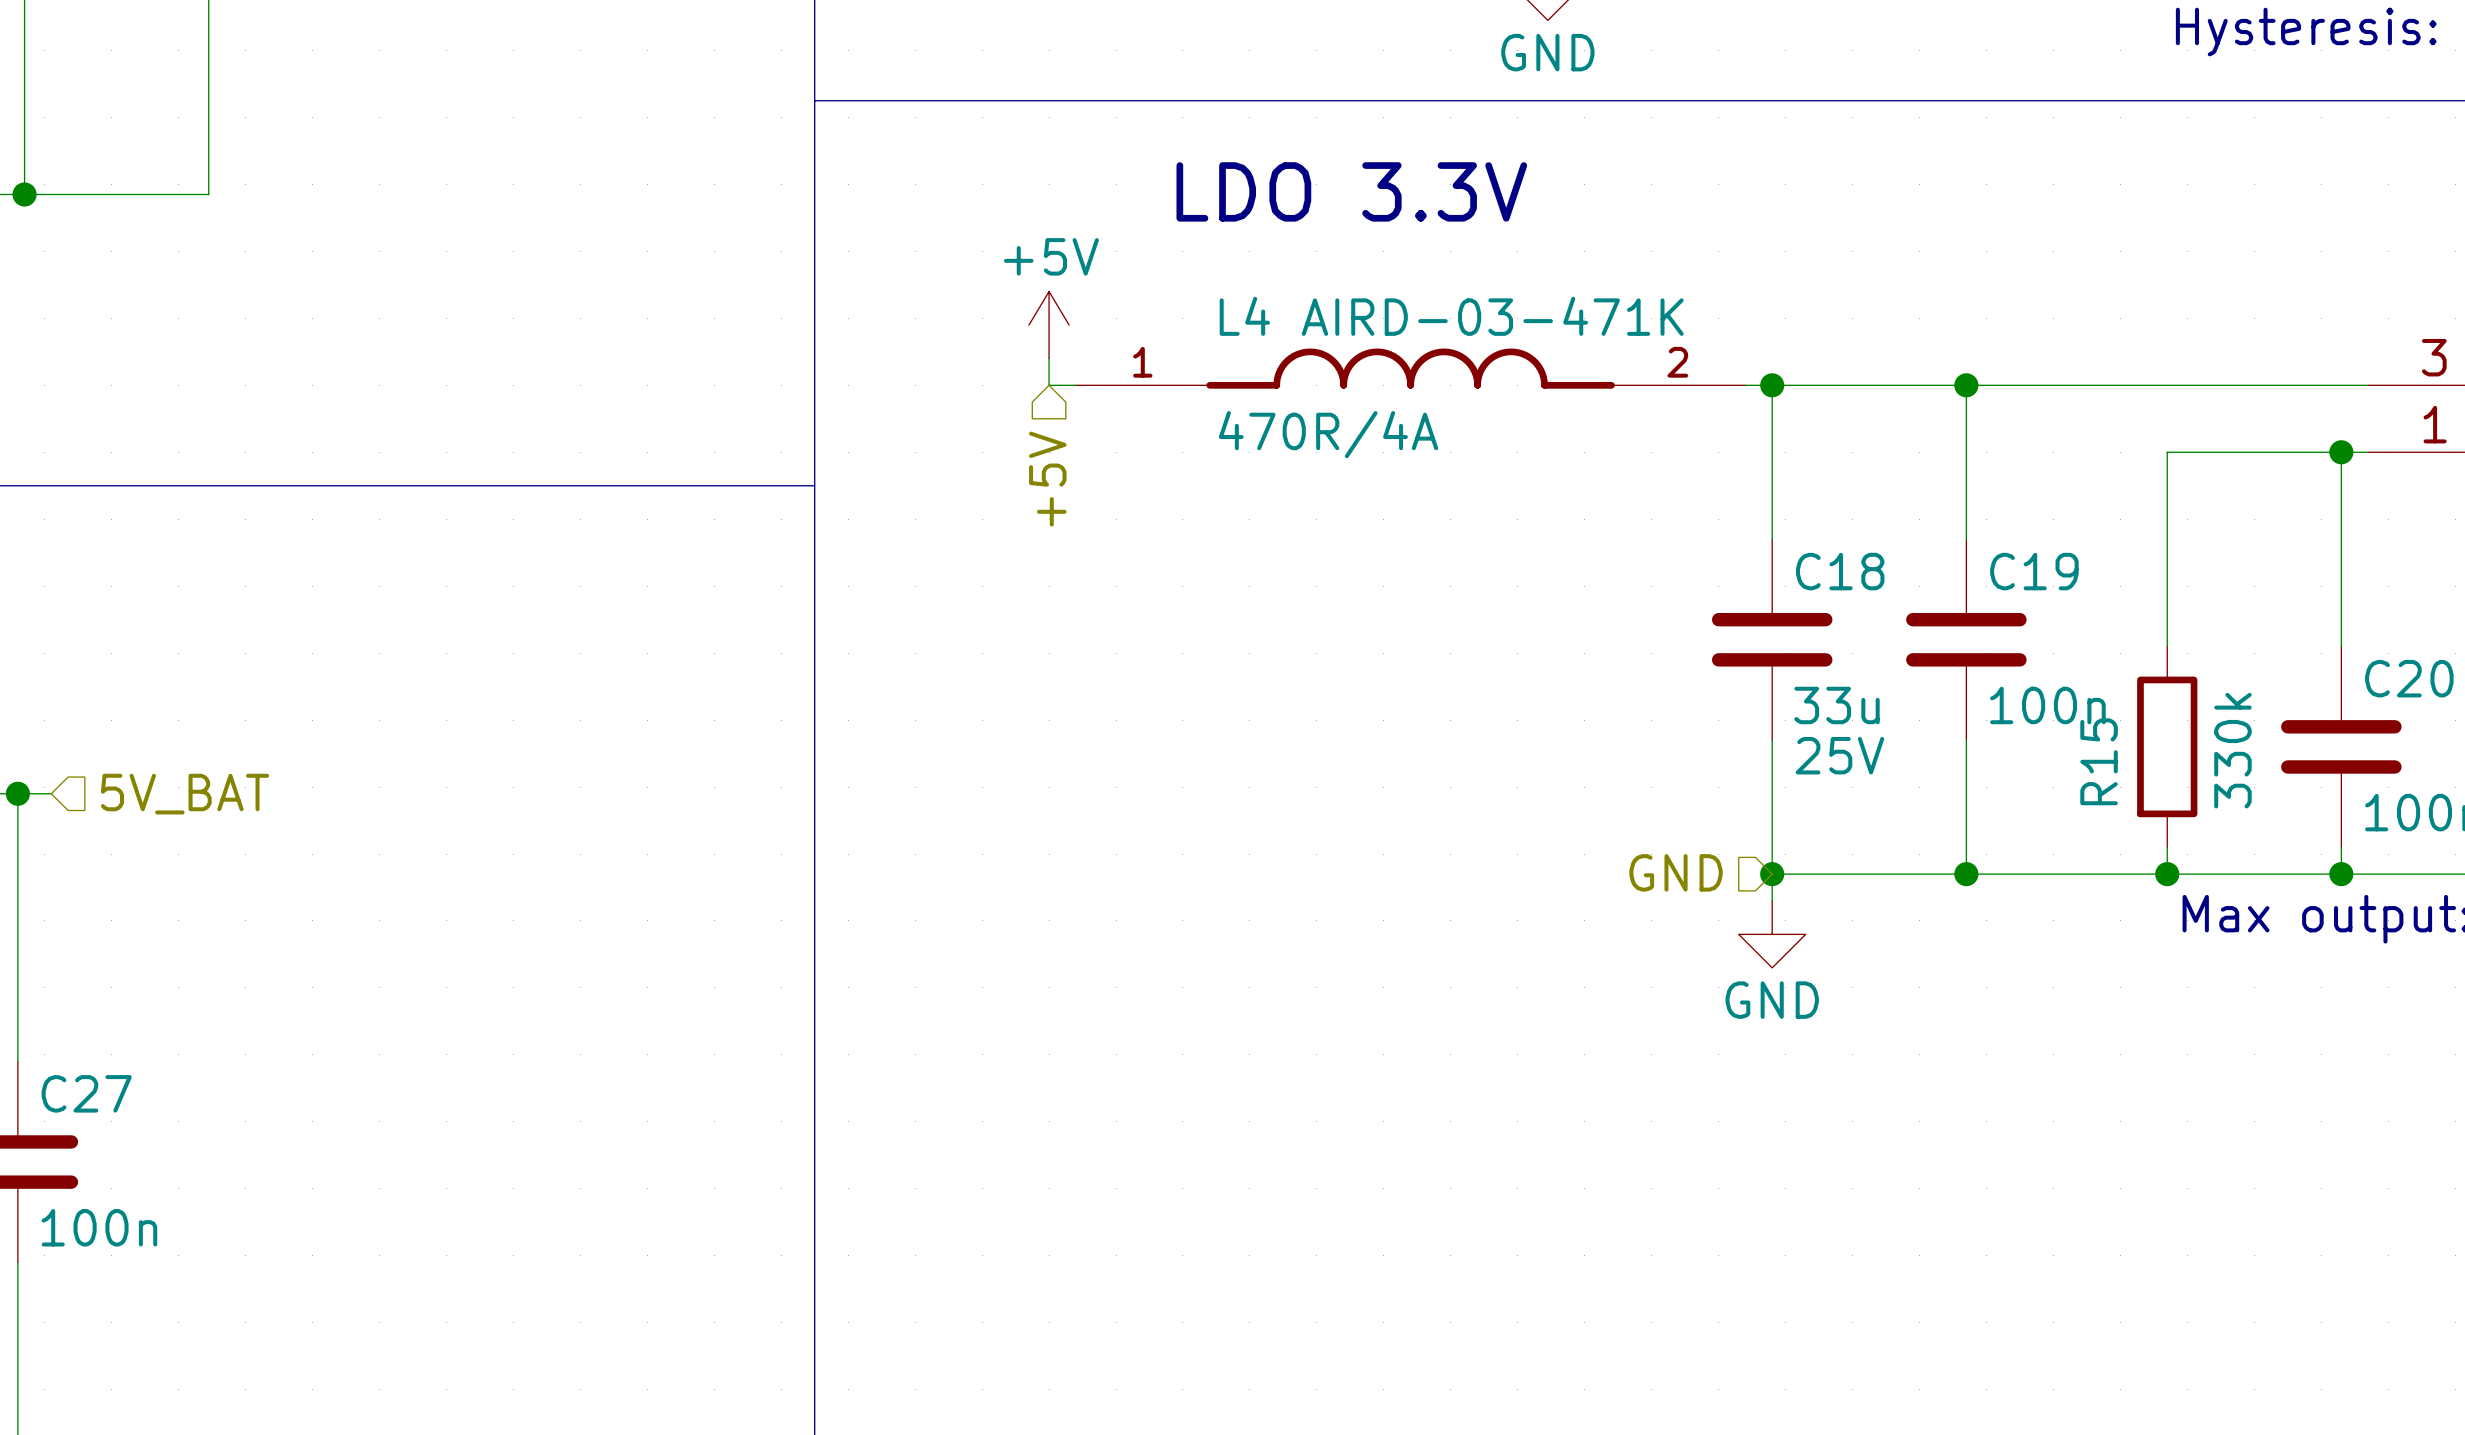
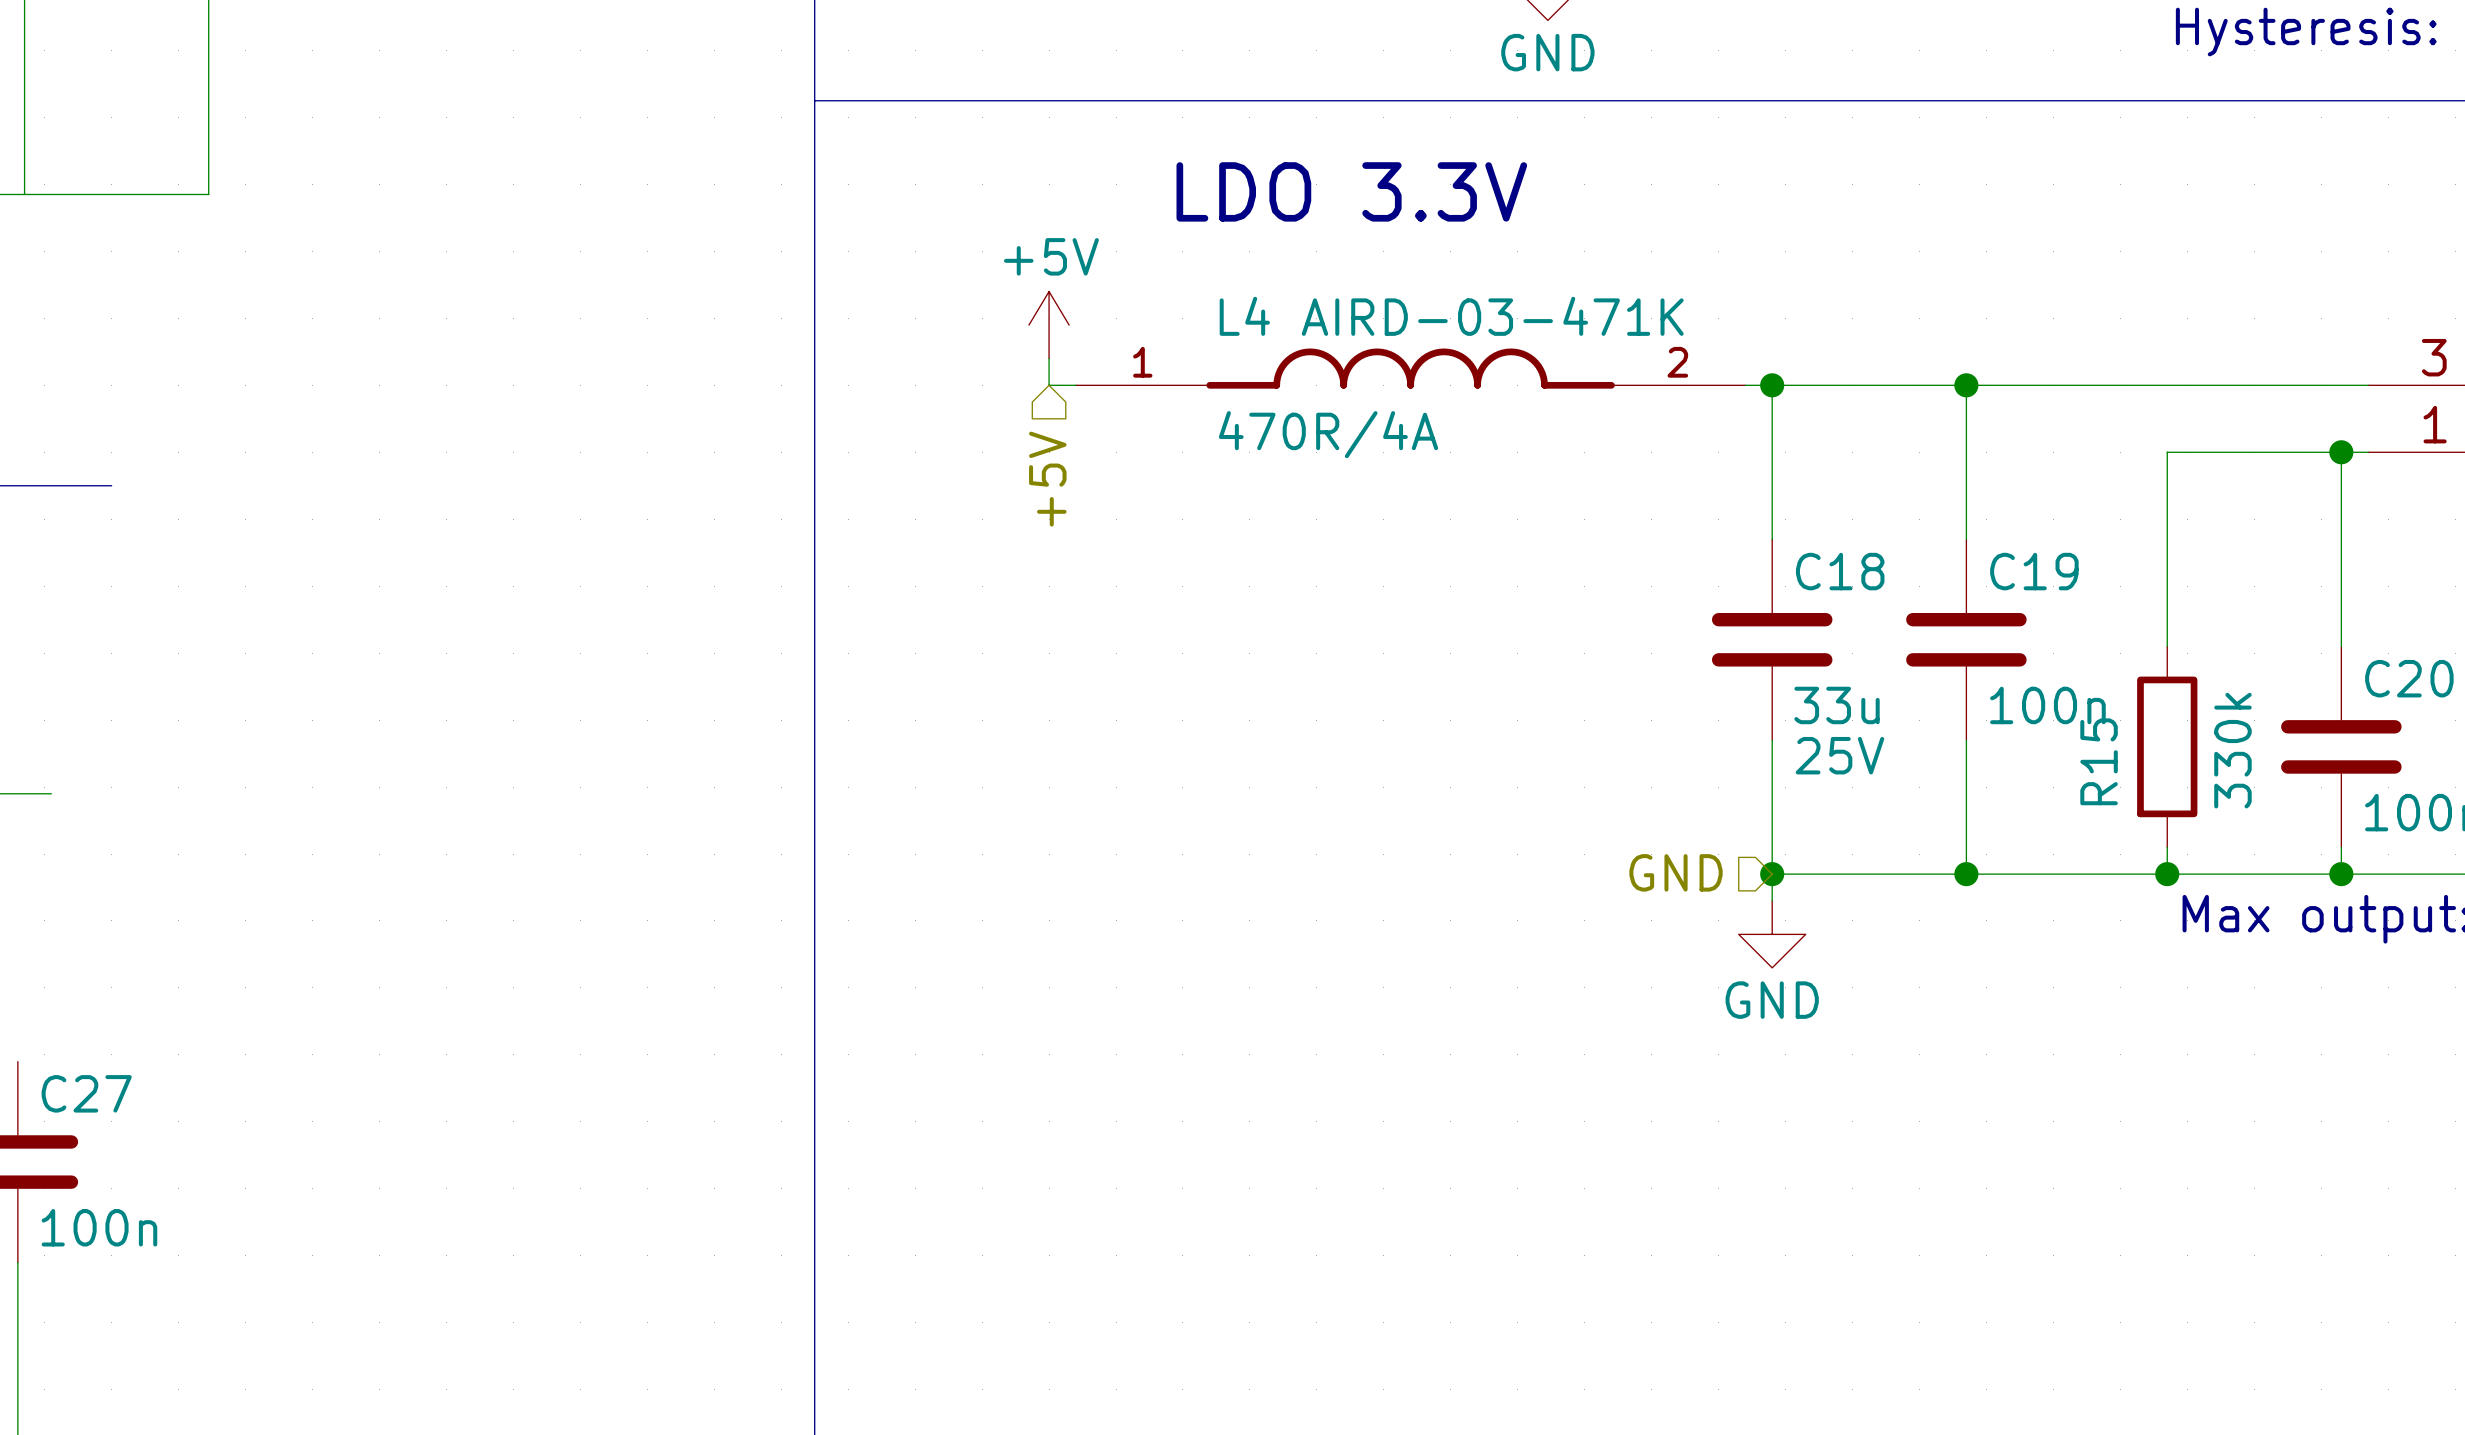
junction: (24, 194) -> none
line: (111, 485) (814, 485) -> none
wire: (17, 793) (17, 1061) -> none
junction: (17, 793) -> none
hierarchical label: 5V_BAT (185, 794) -> none

